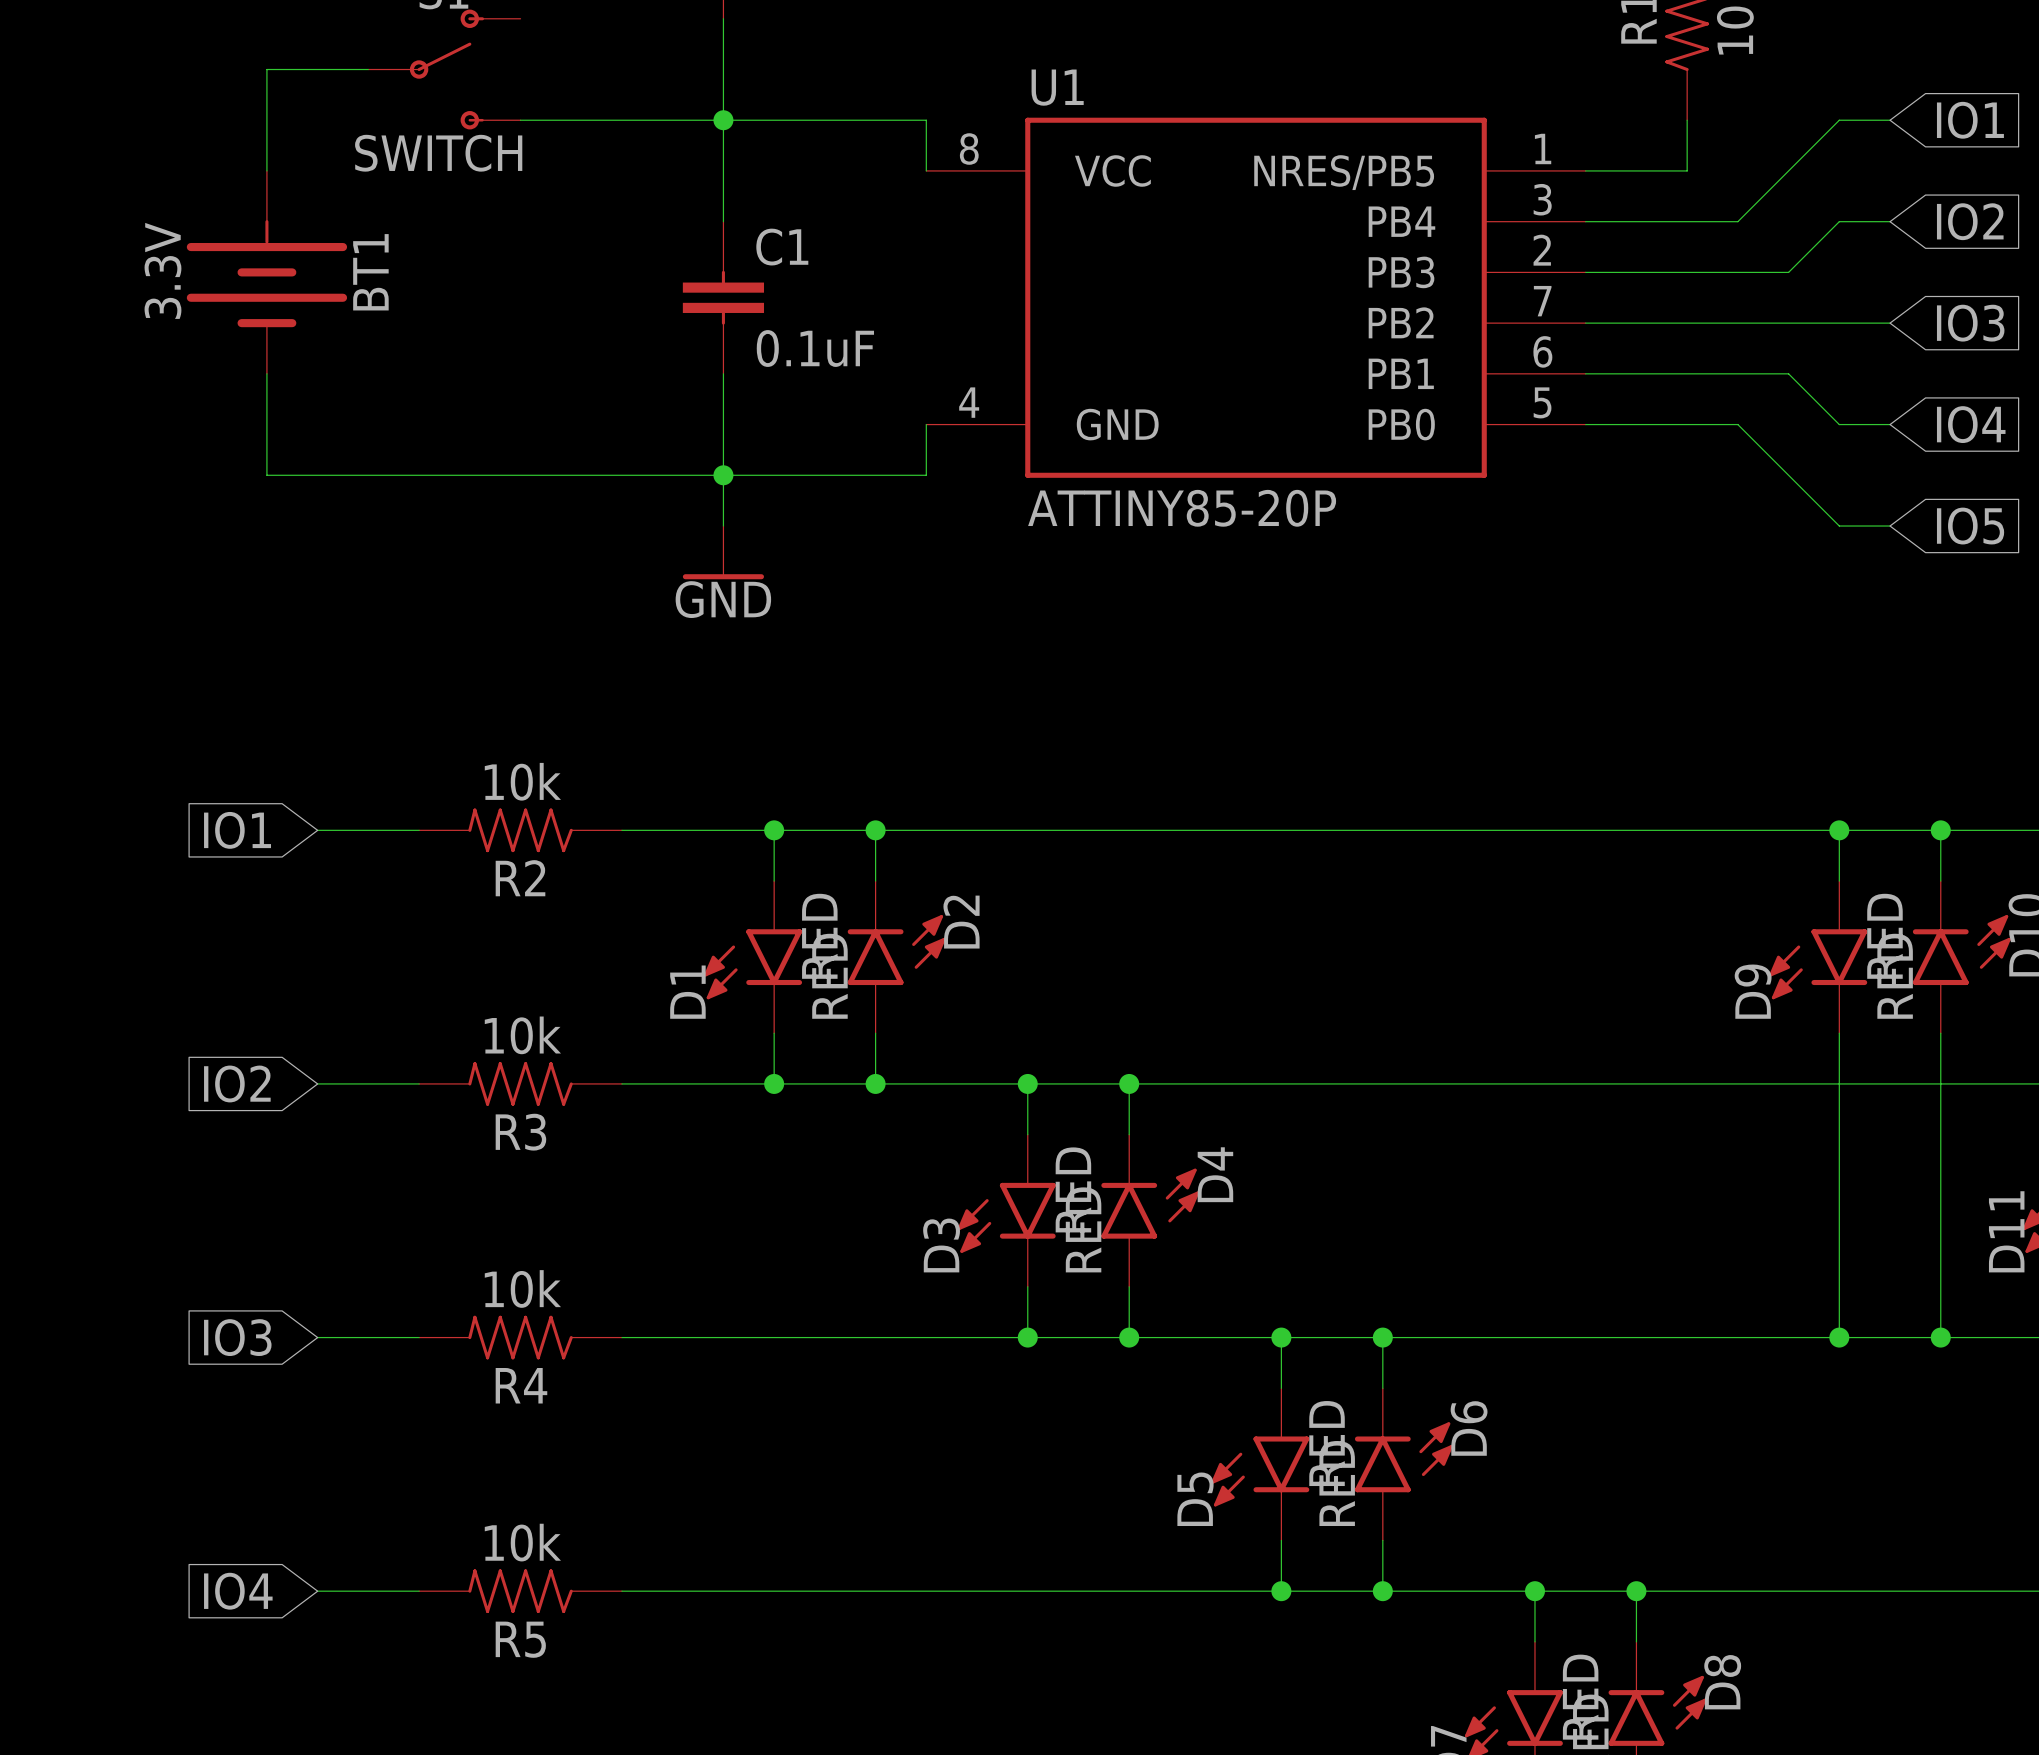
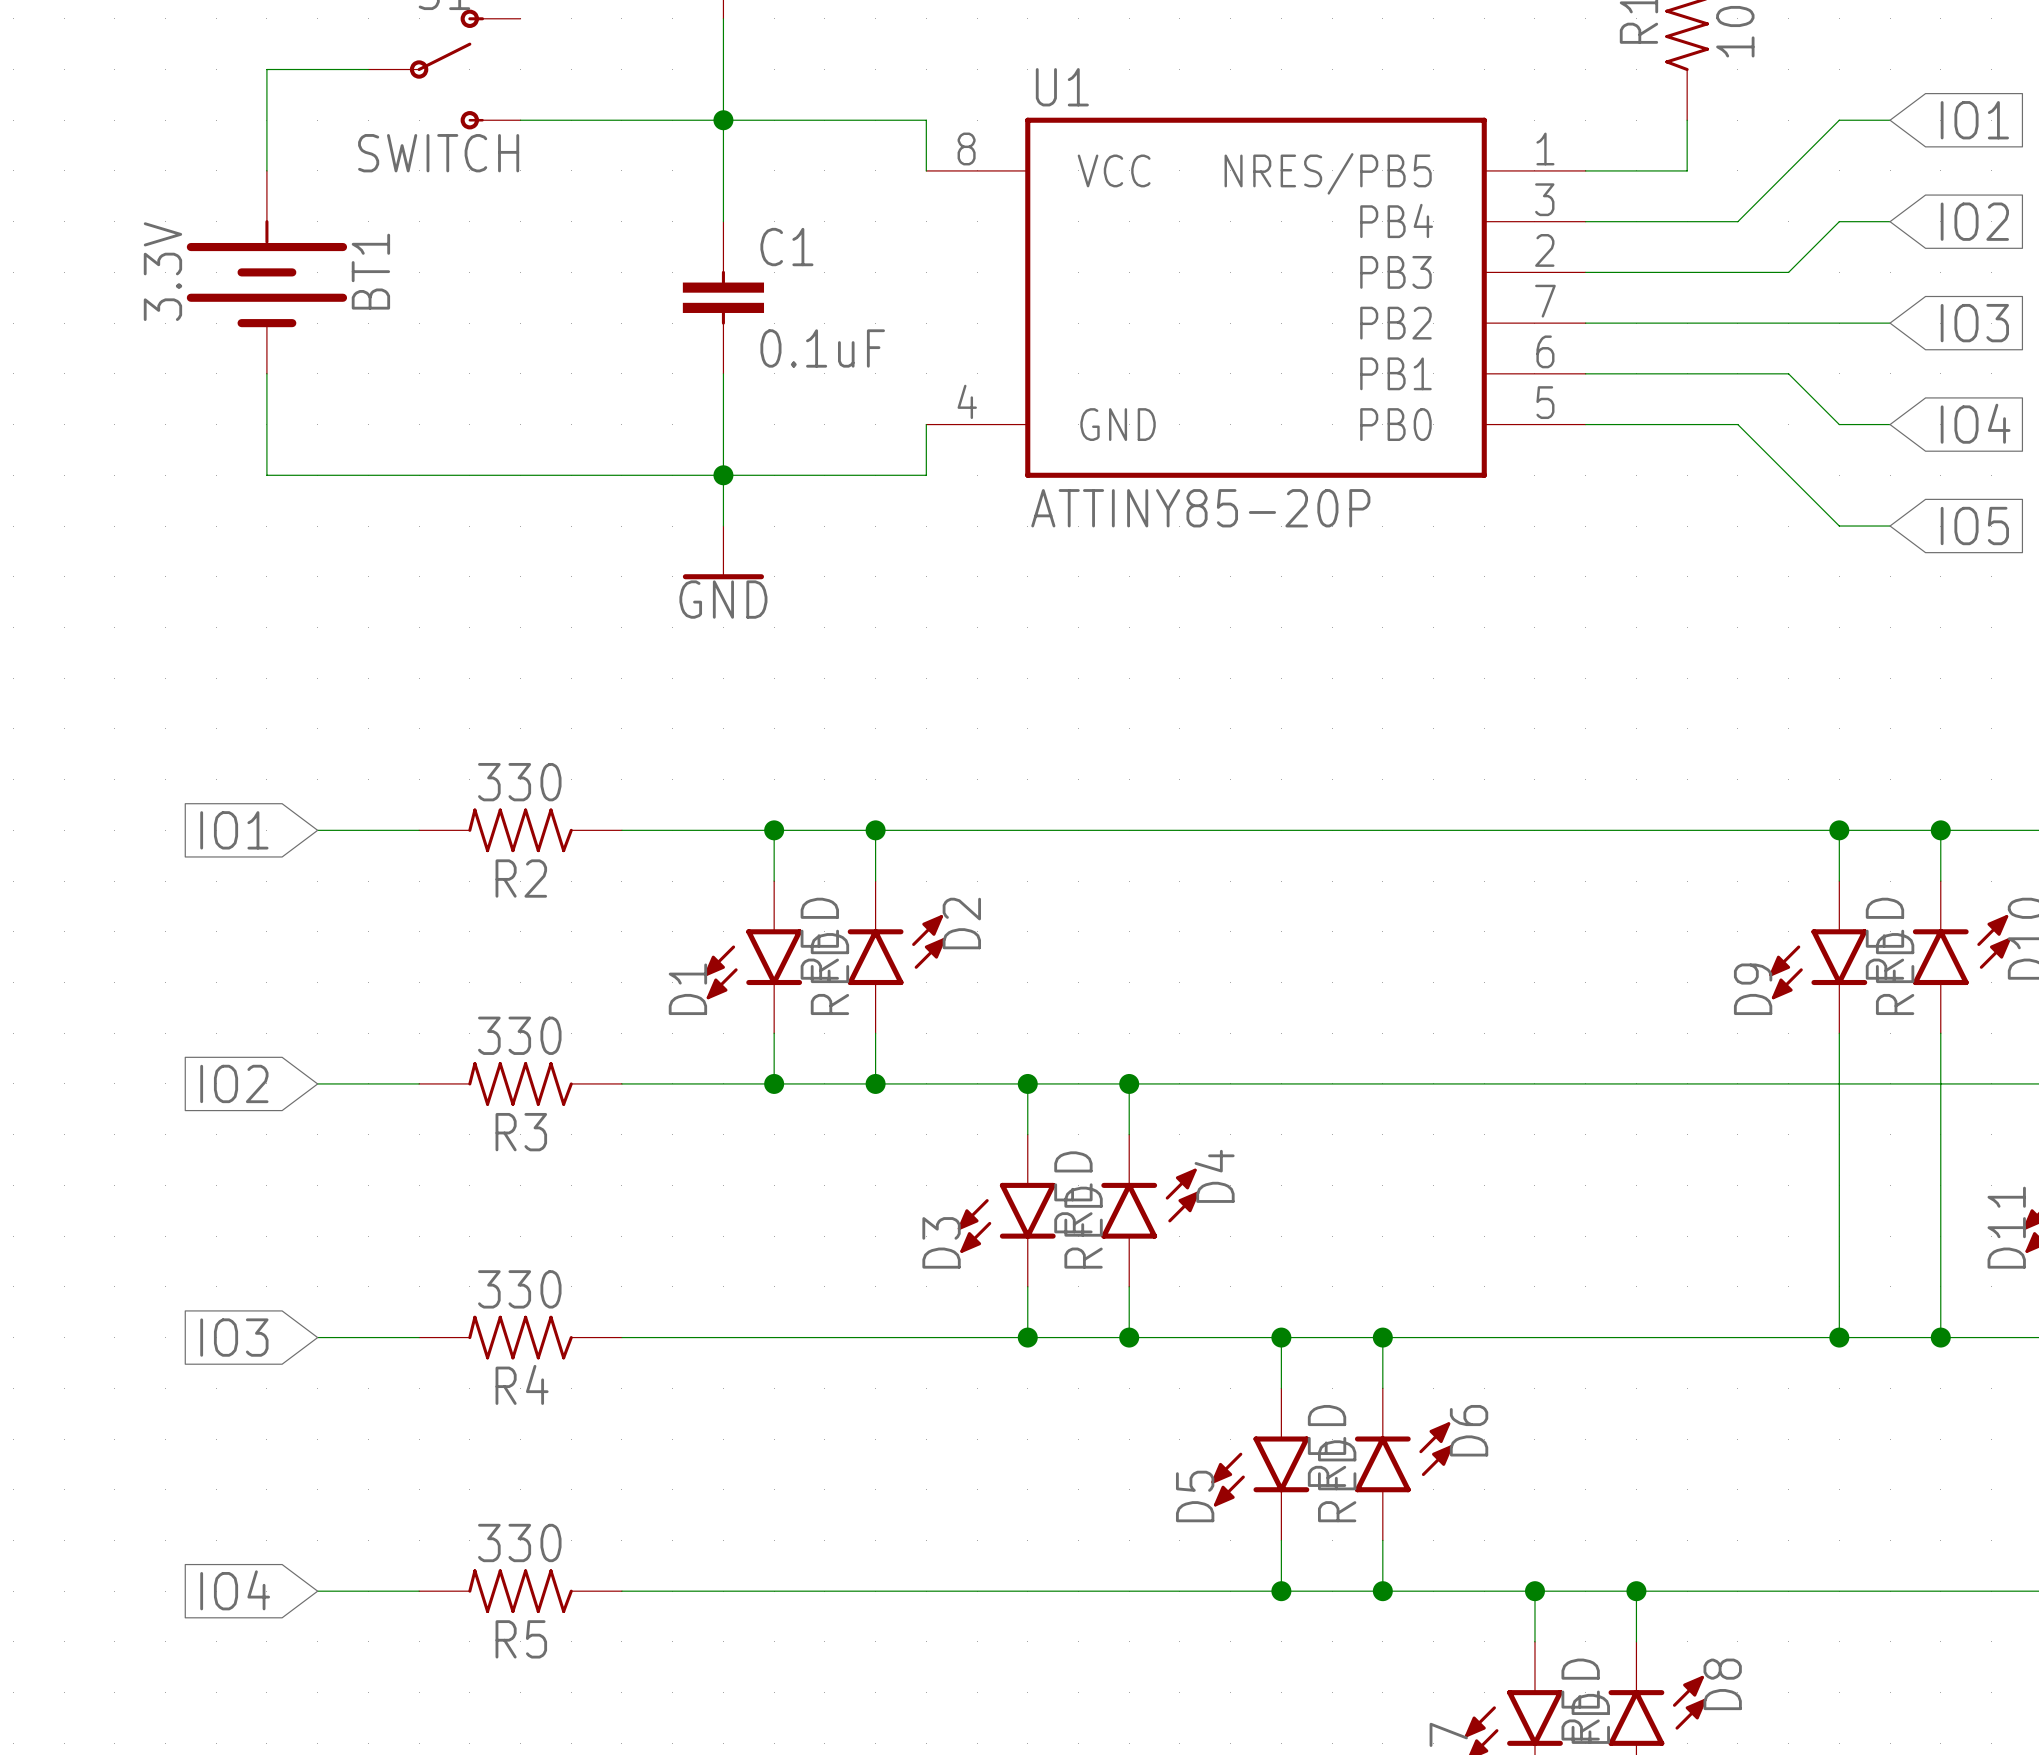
R2 value: 10k (522, 781) -> 330 (519, 782)
R3 value: 10k (522, 1035) -> 330 (519, 1035)
R4 value: 10k (522, 1288) -> 330 (519, 1289)
R5 value: 10k (522, 1542) -> 330 (519, 1542)

